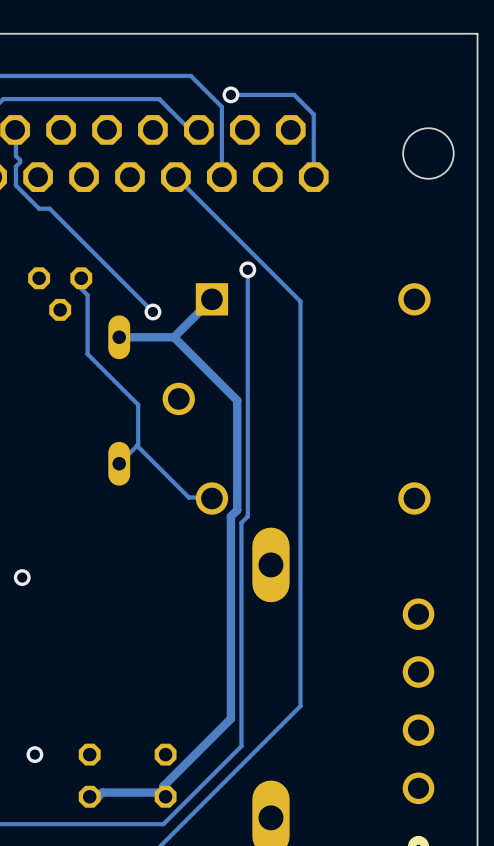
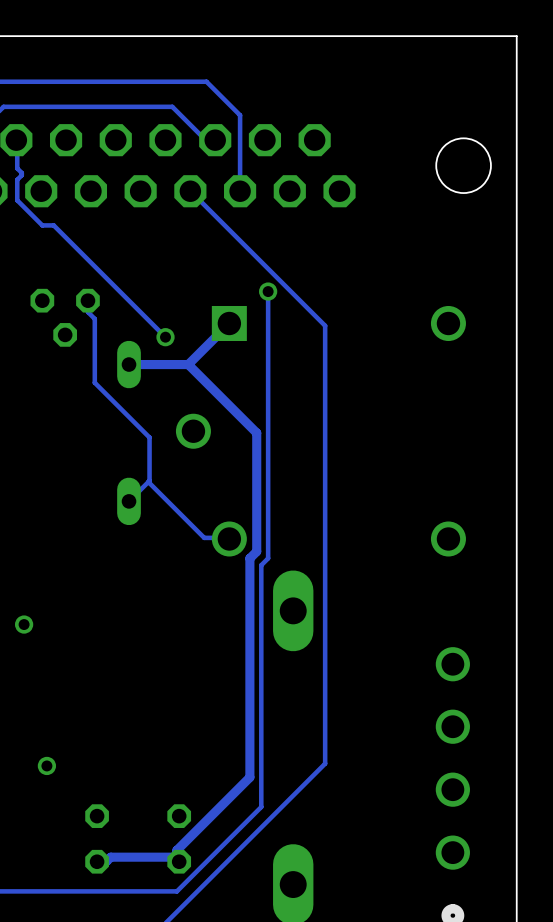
track: (230, 94) (294, 94) (313, 114) (313, 177) -> none
via: (230, 94) -> none
via position: (34, 754) -> (46, 765)

